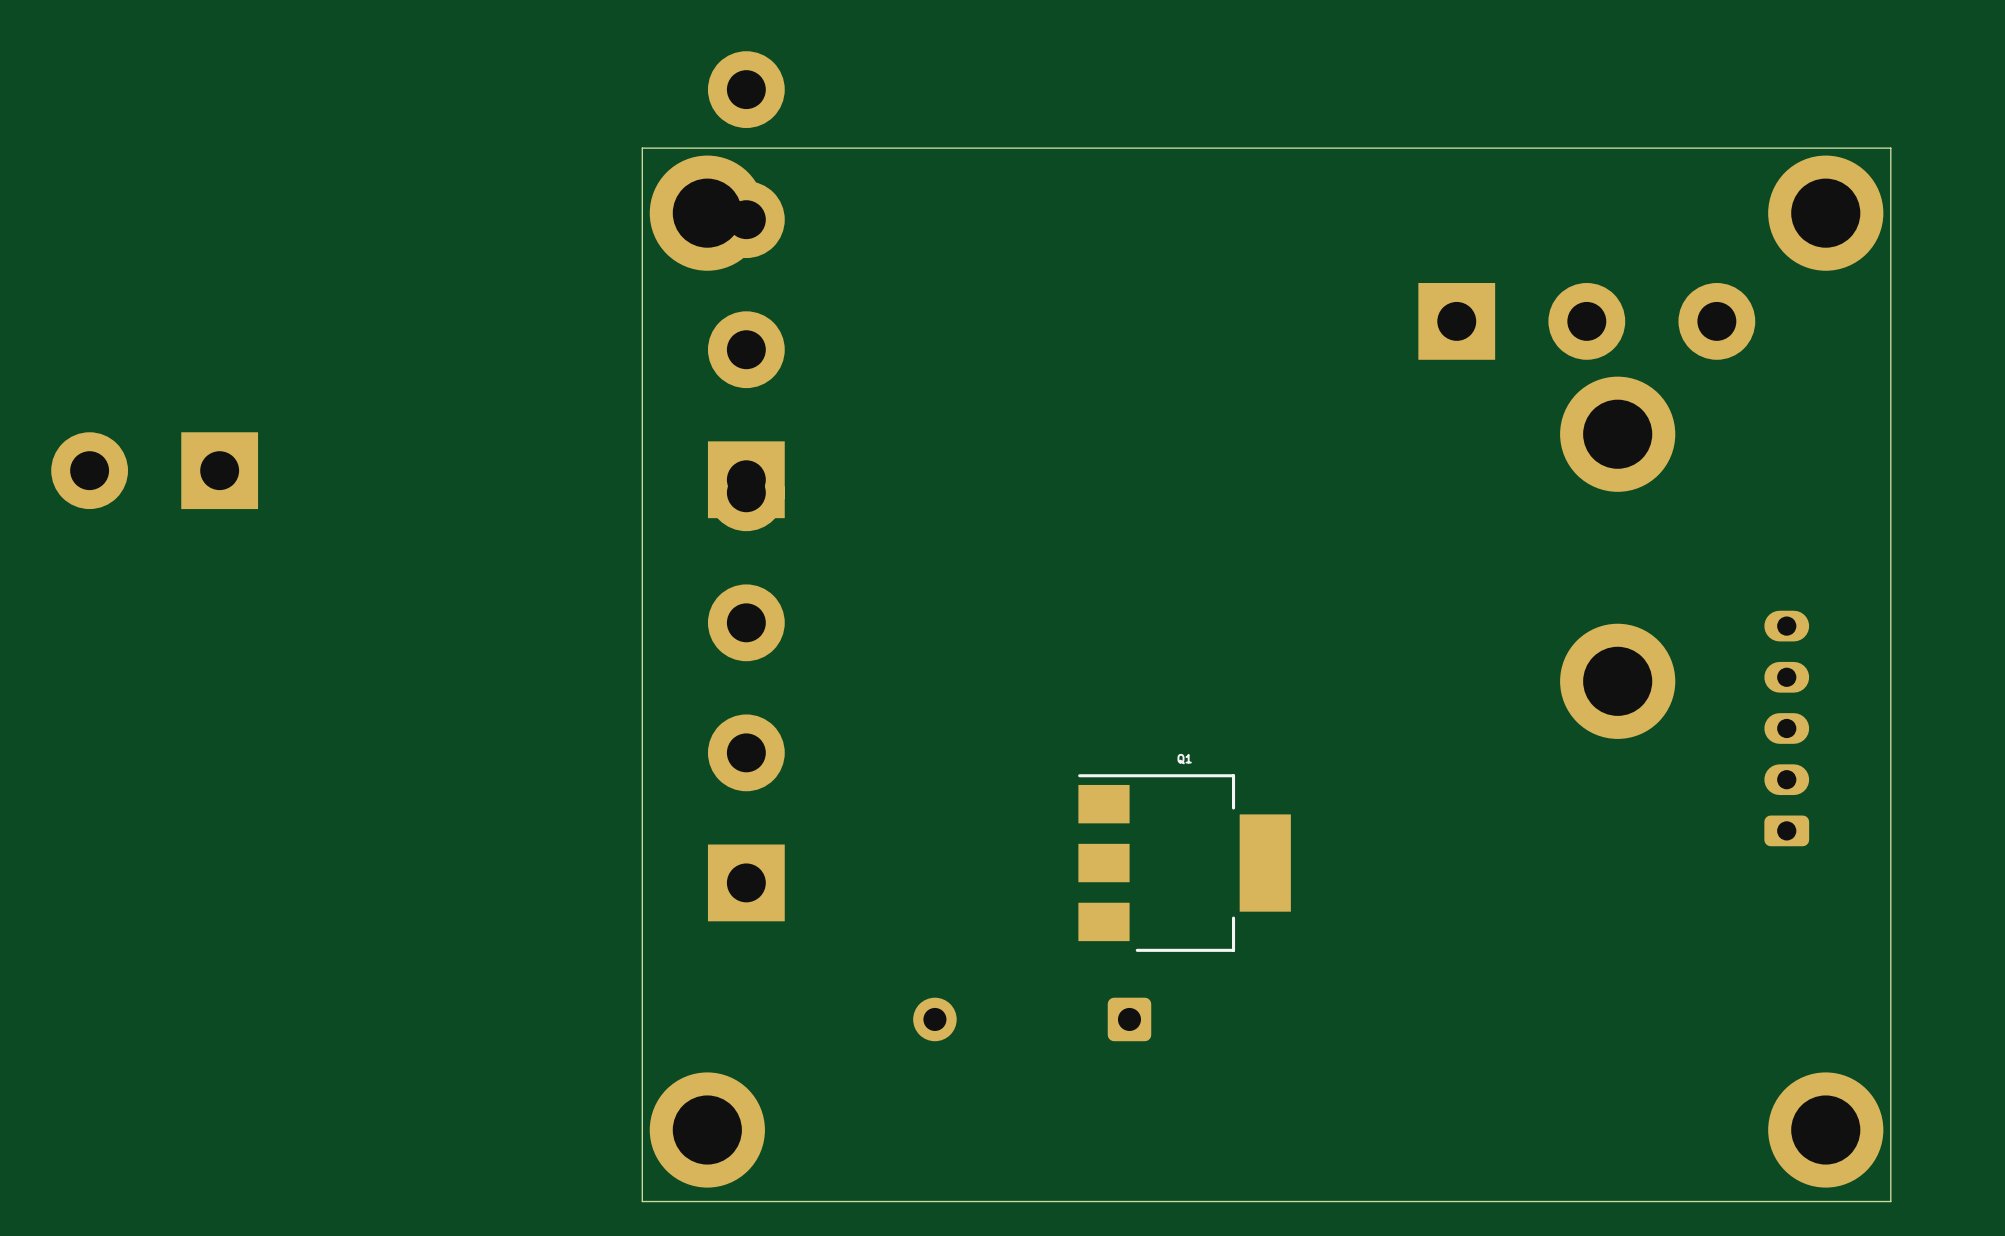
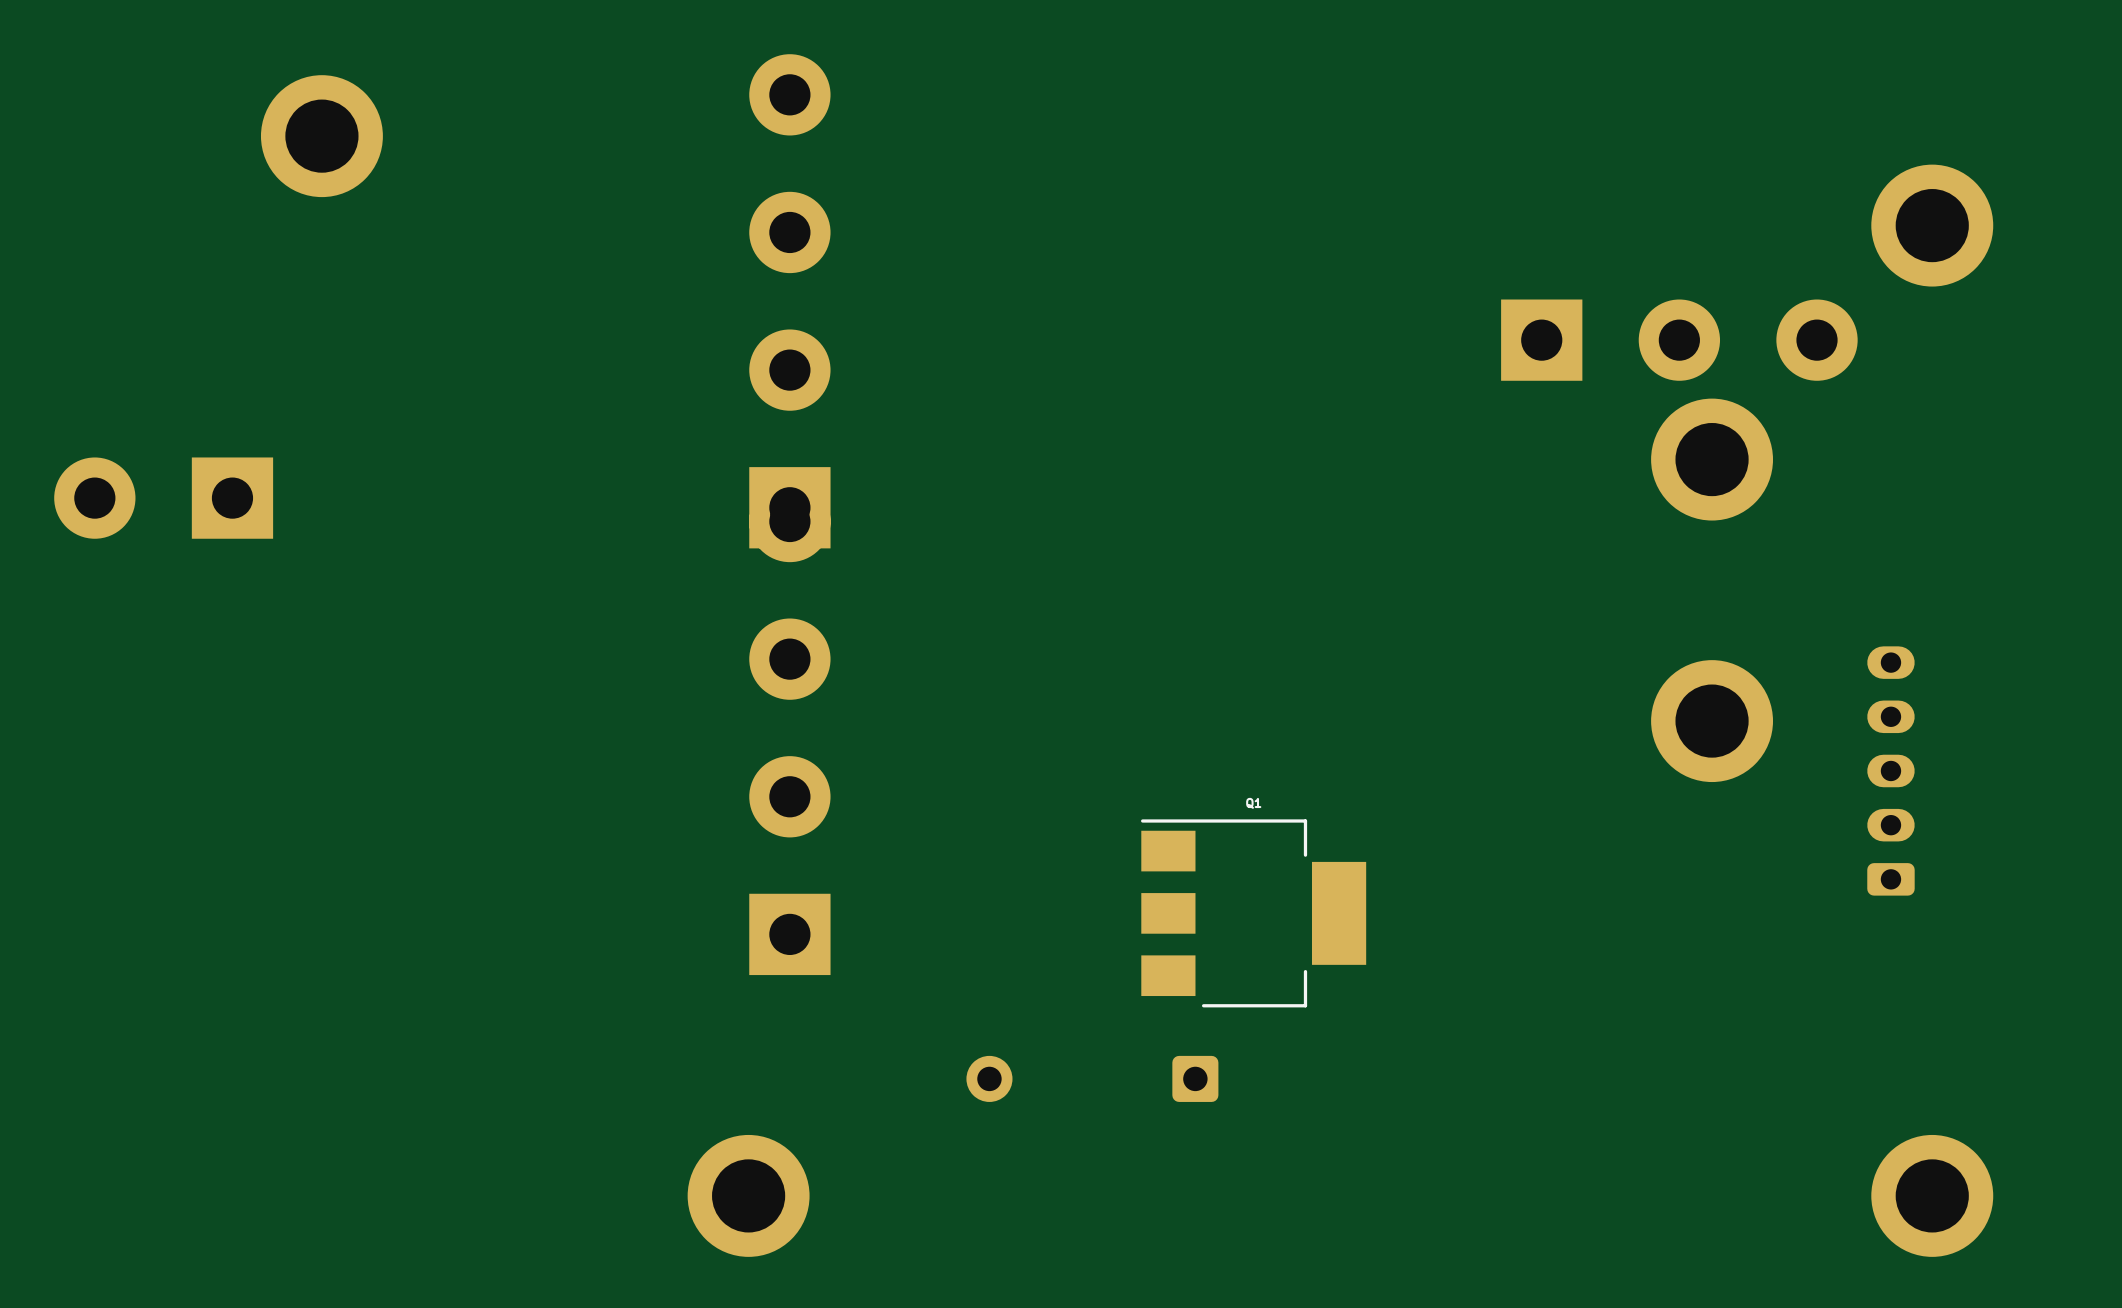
board edge: (1890, 148) (642, 148) (642, 1201) (1890, 1201) (1890, 148) -> none
part position: (707, 213) -> (321, 136)

